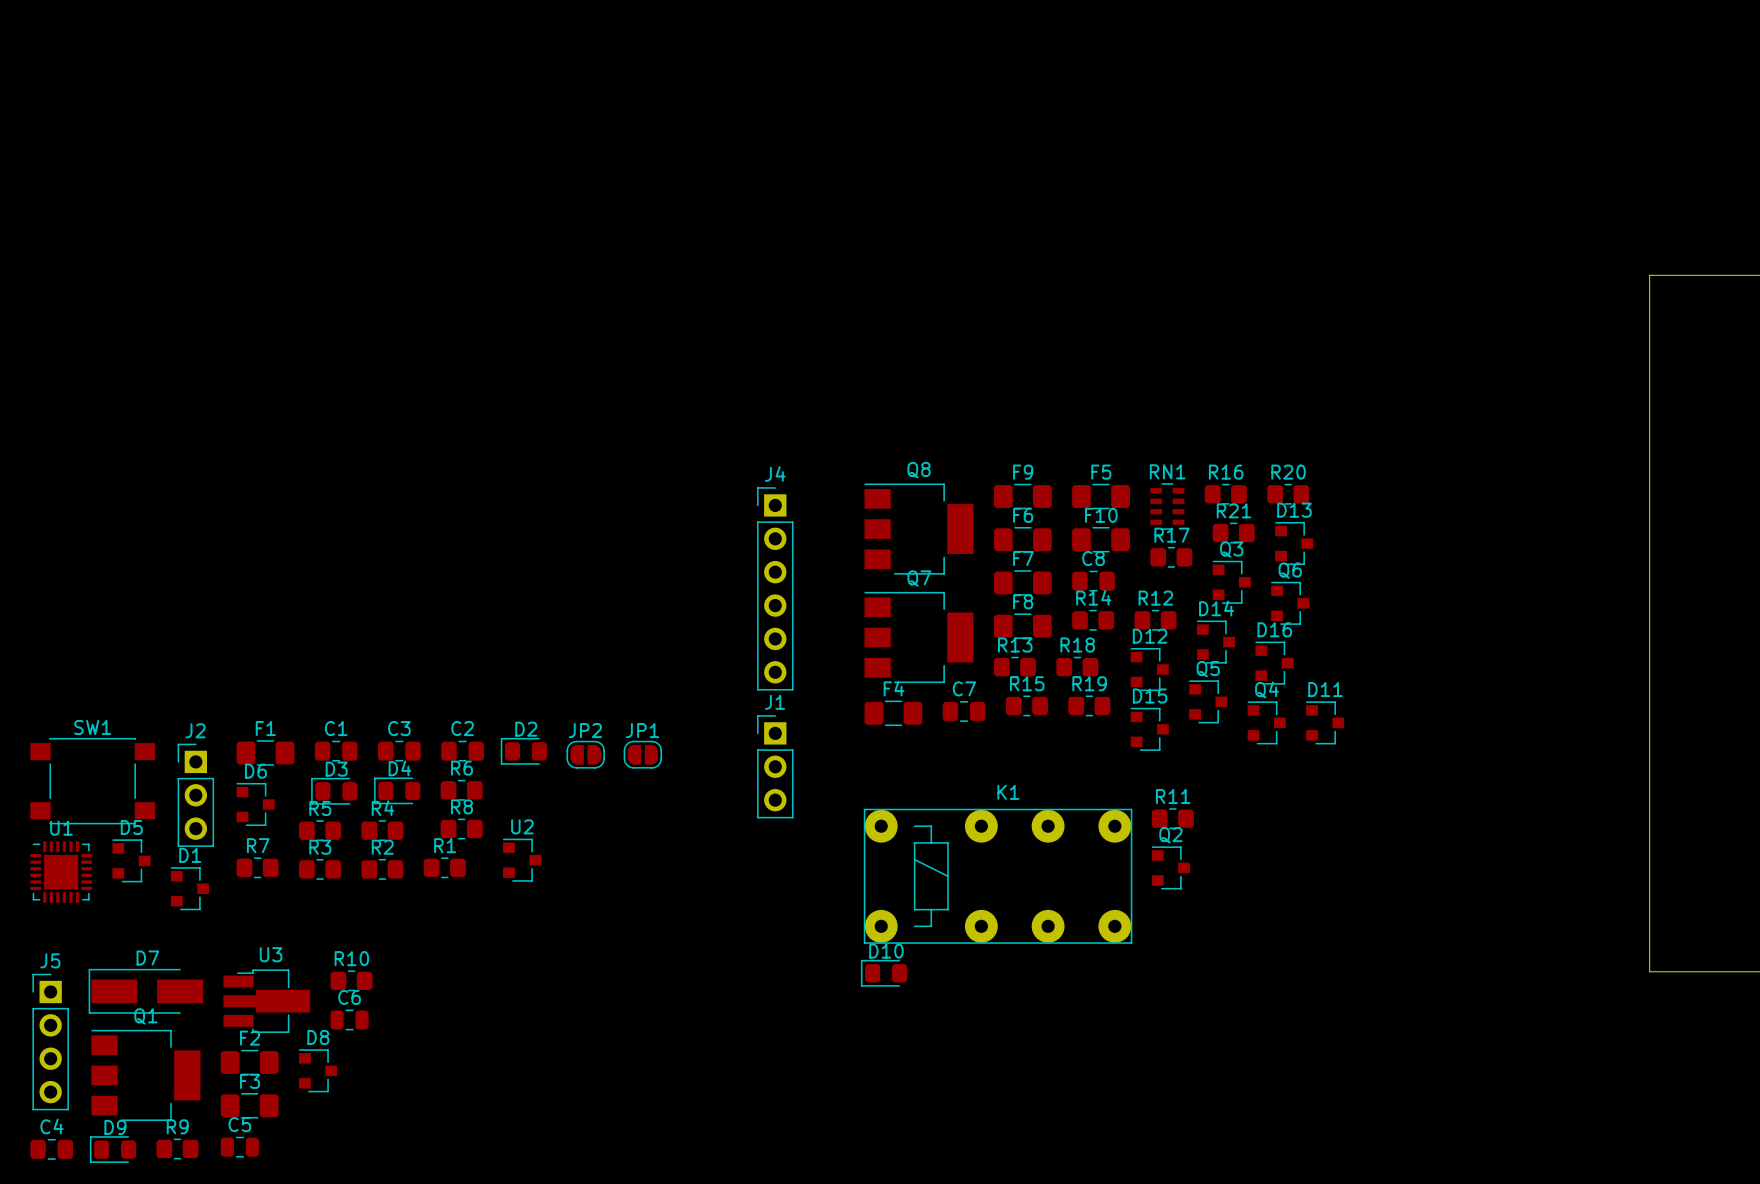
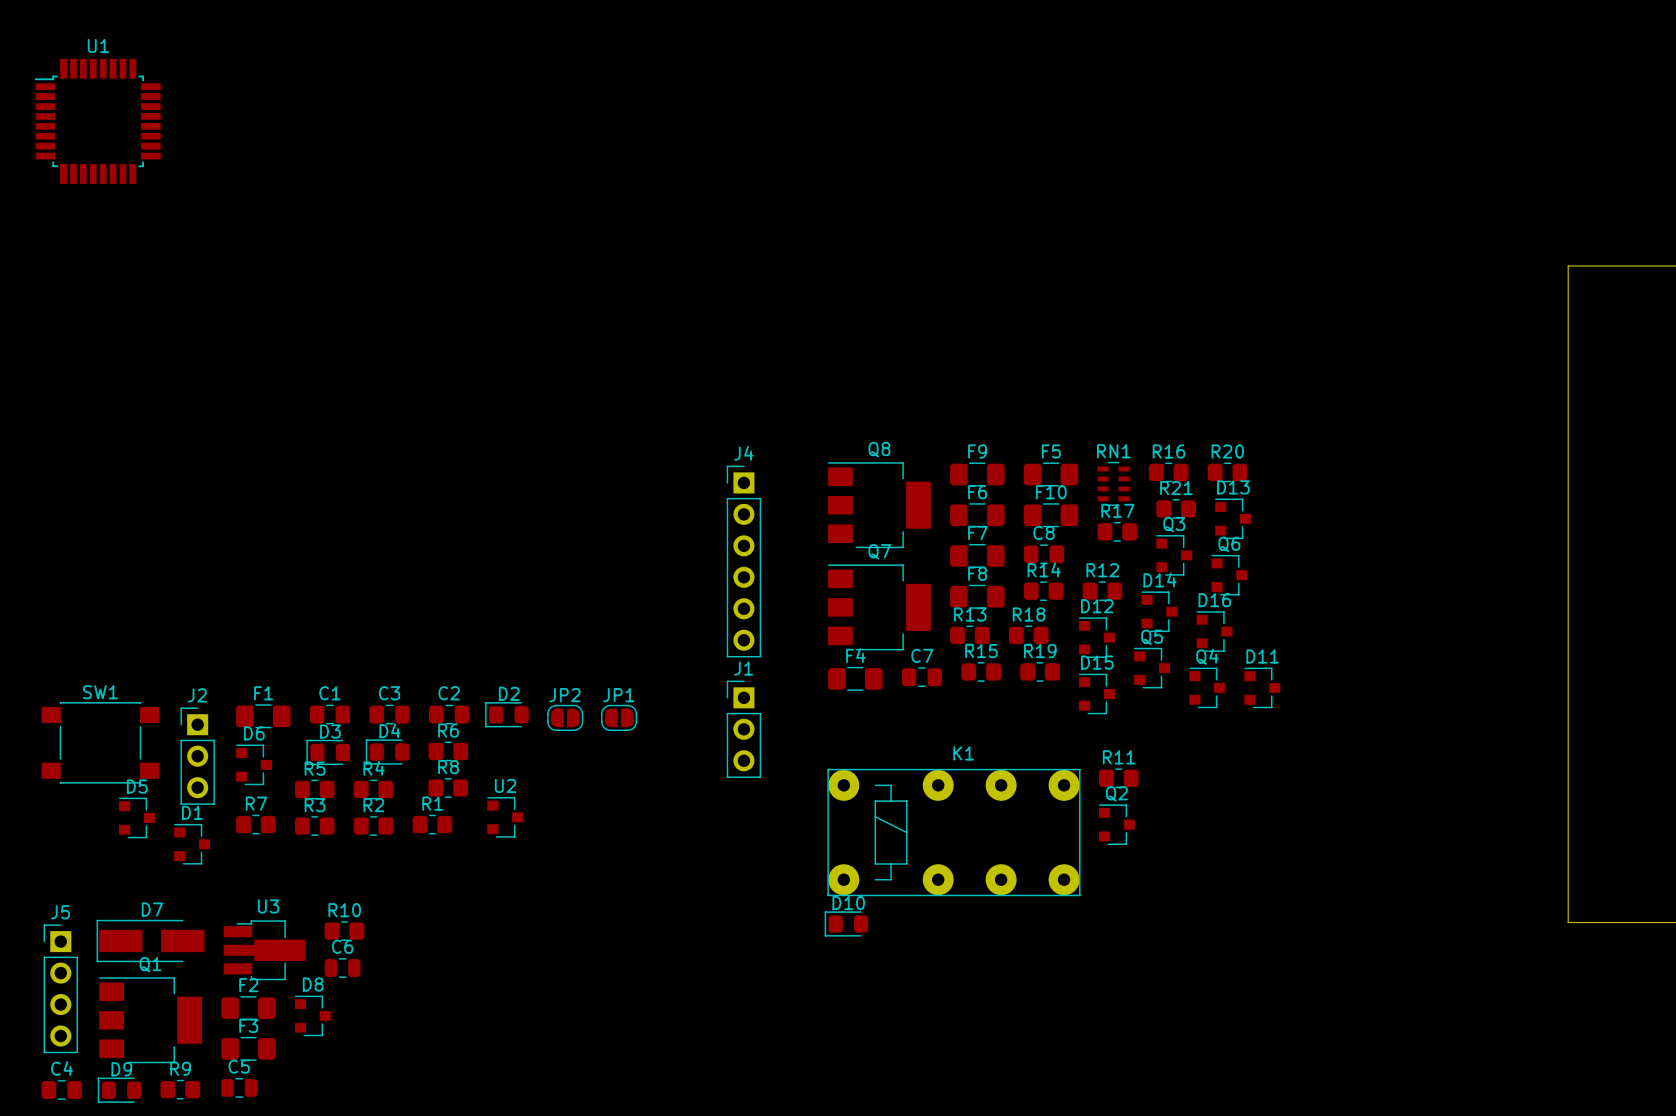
U1 name position: U1 (61, 828) -> U1 (98, 45)
U1 footprint: [30, 841, 93, 903] -> [34, 58, 161, 184]

